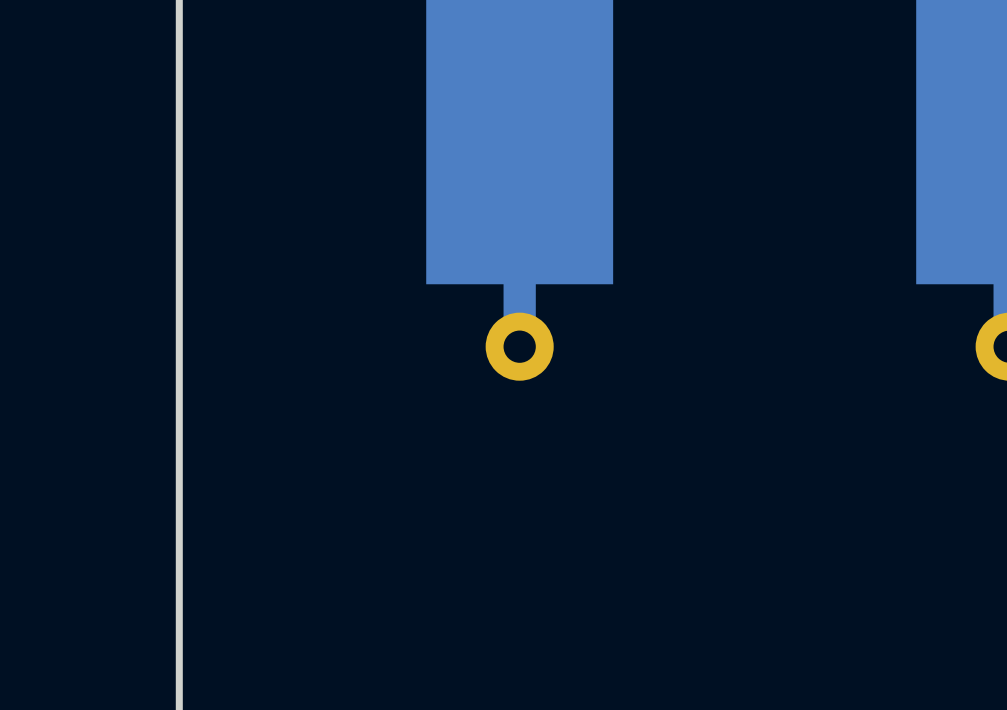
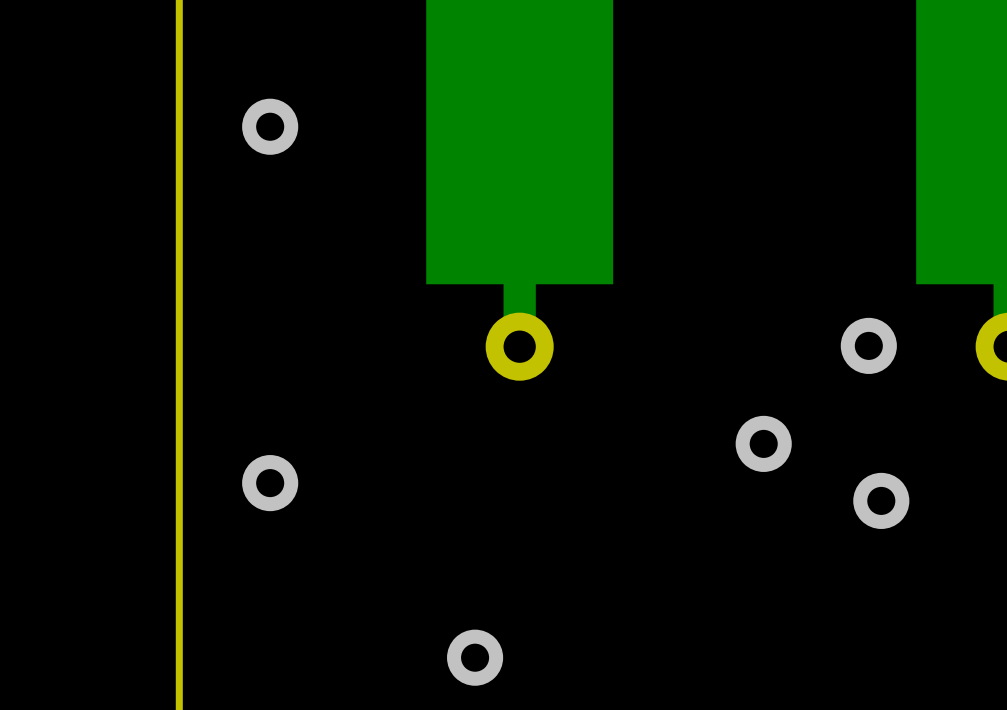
via: none -> (270, 126)
via: none -> (868, 345)
via: none -> (763, 443)
via: none -> (270, 483)
via: none -> (881, 500)
via: none -> (475, 657)

